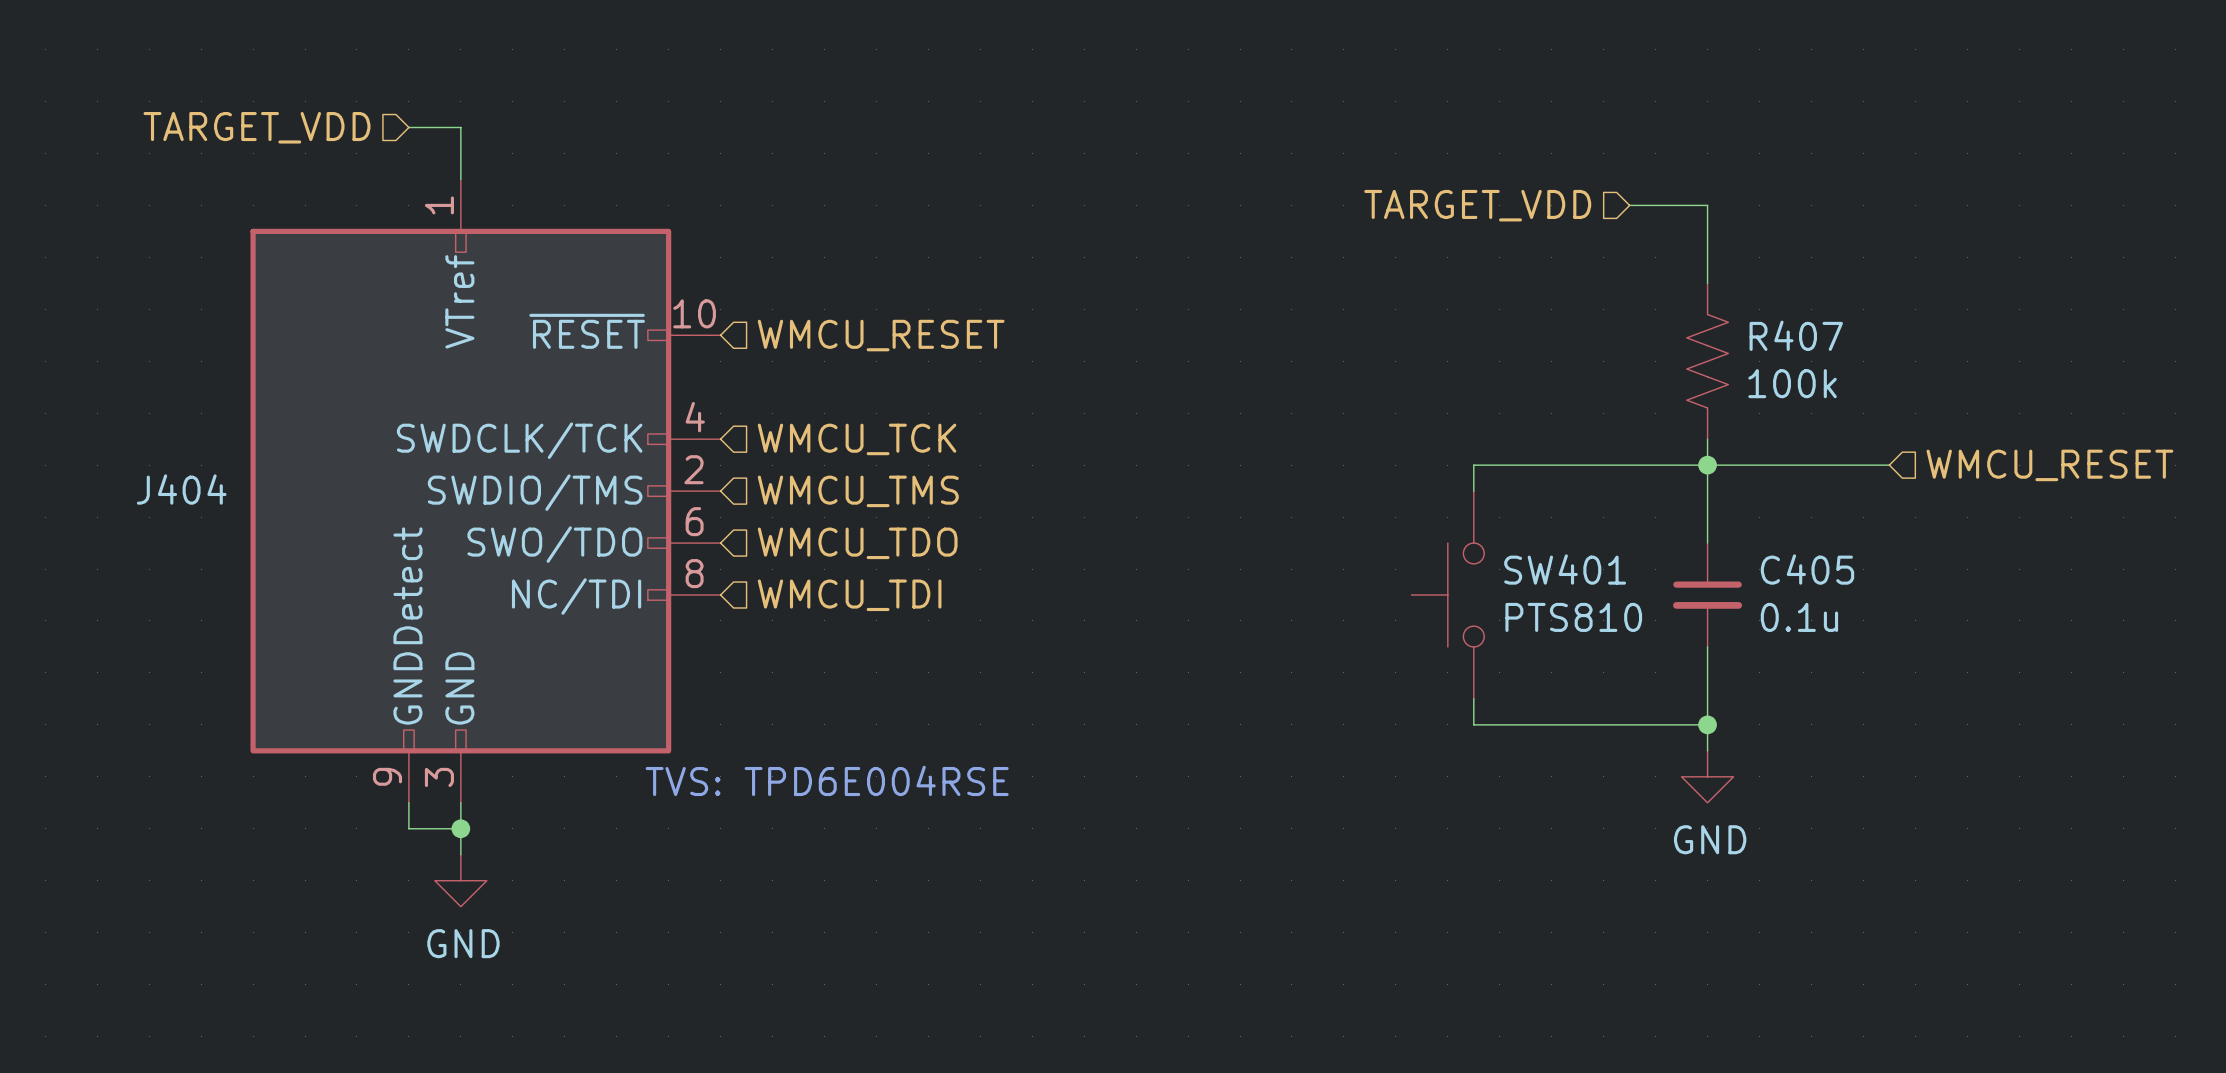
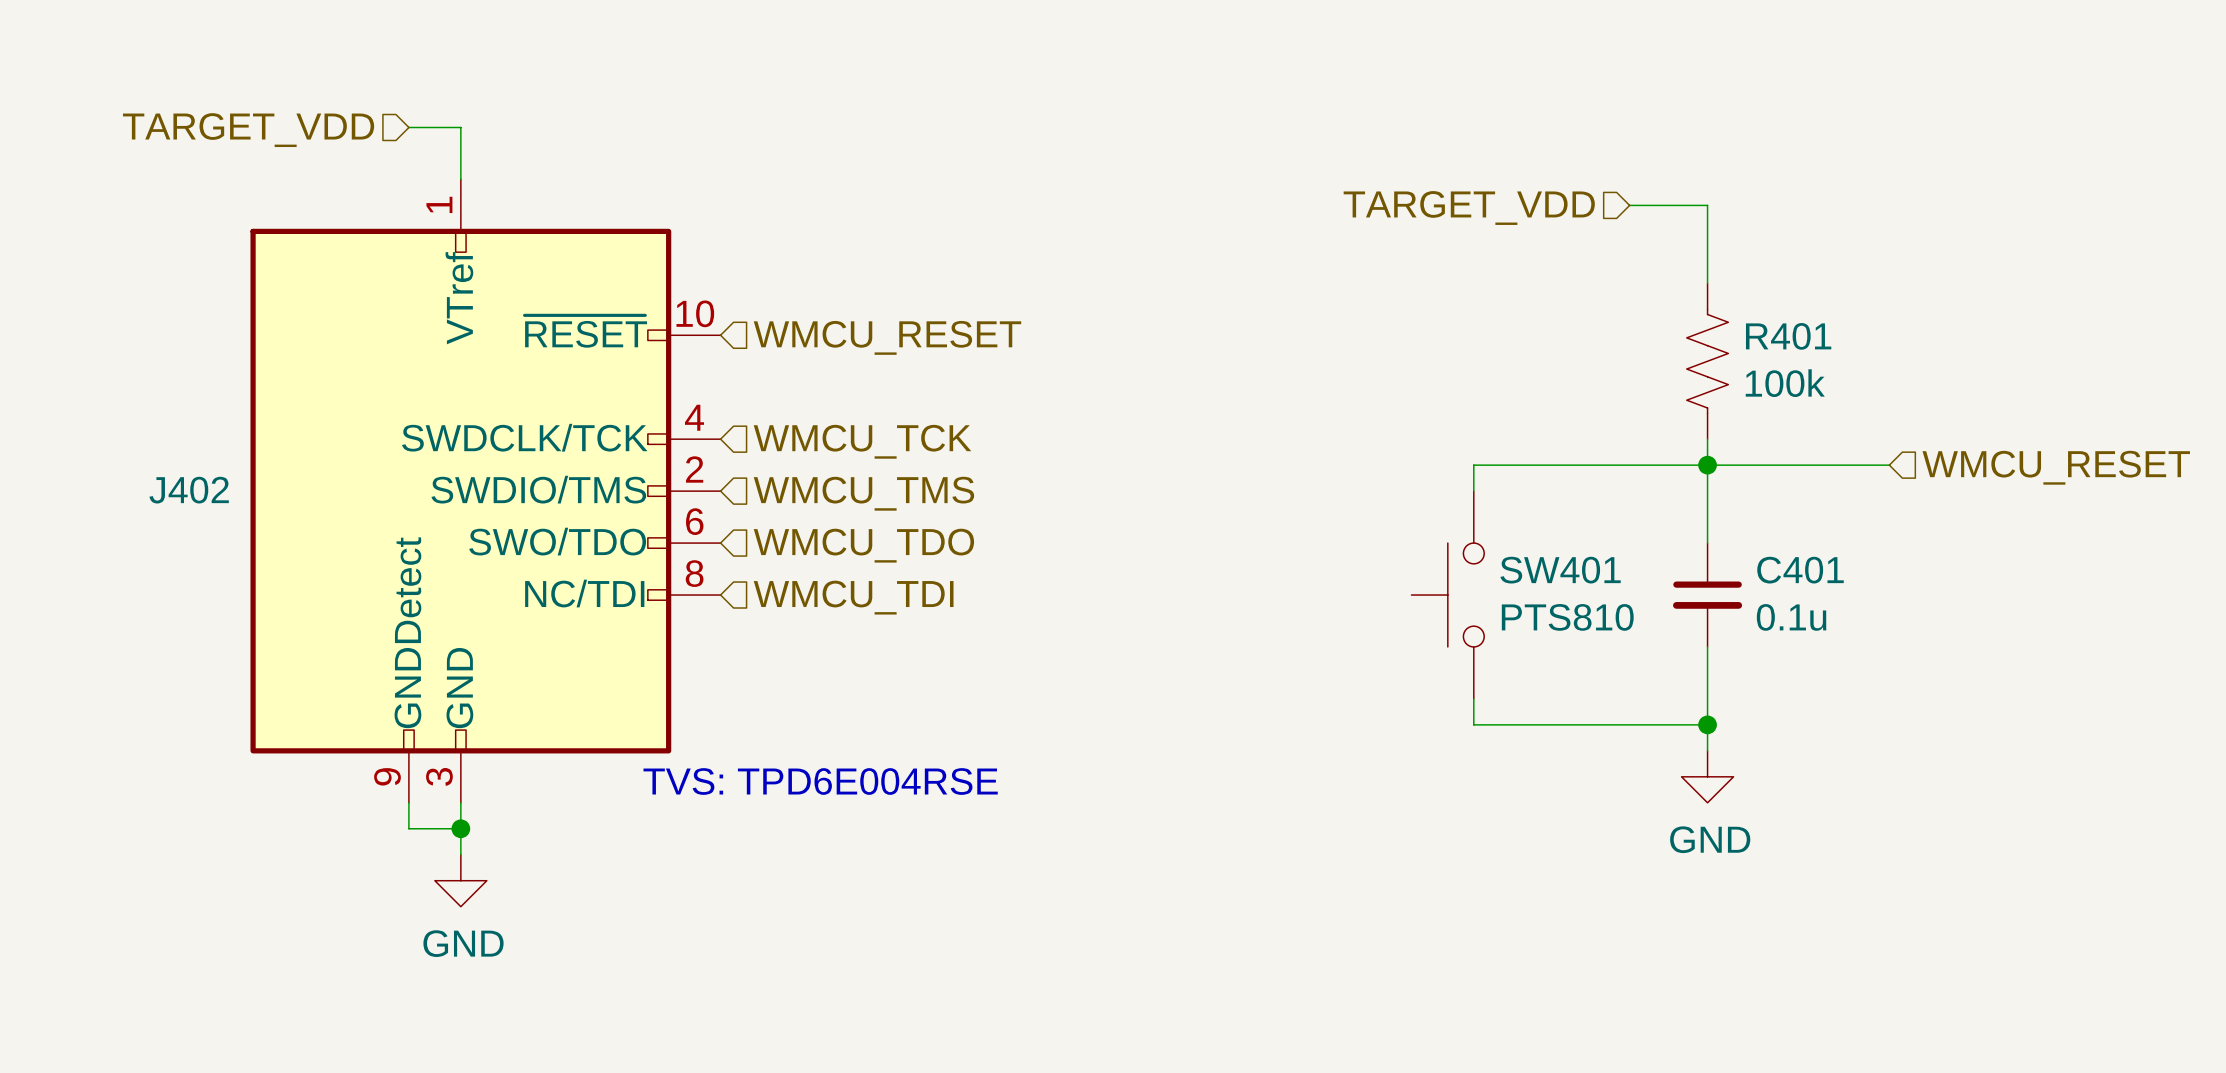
R407 name: R407 (1796, 335) -> R401 (1788, 336)
J404 name: J404 (181, 489) -> J402 (189, 490)
C405 name: C405 (1807, 569) -> C401 (1800, 570)

